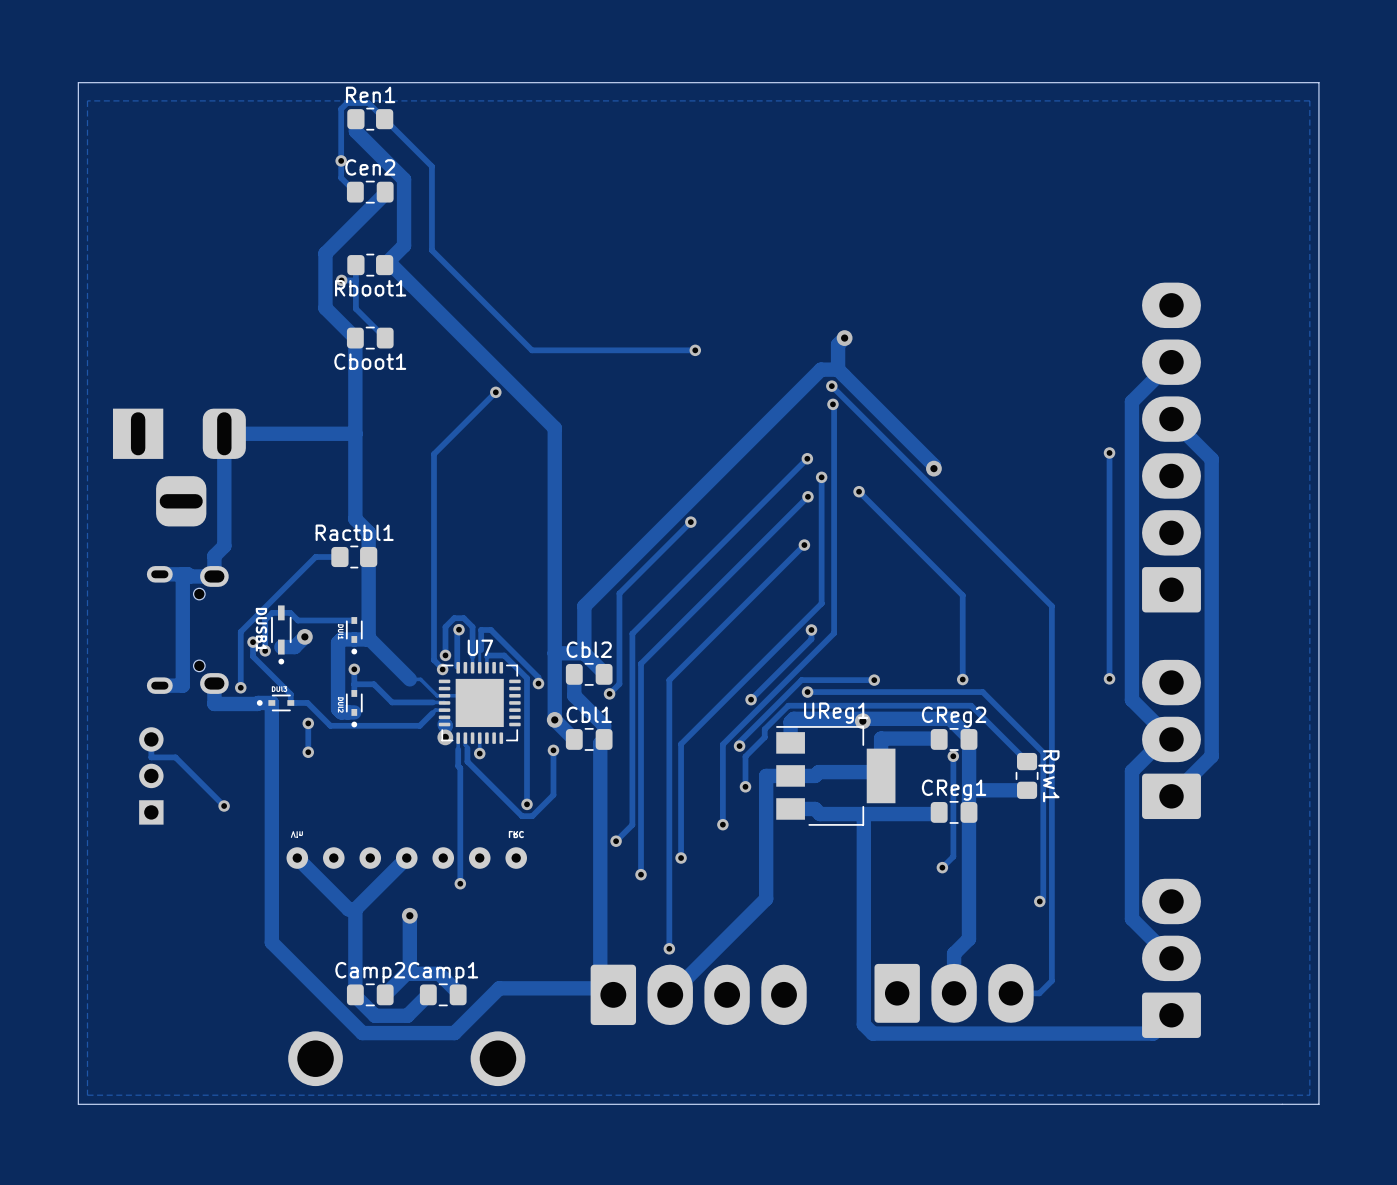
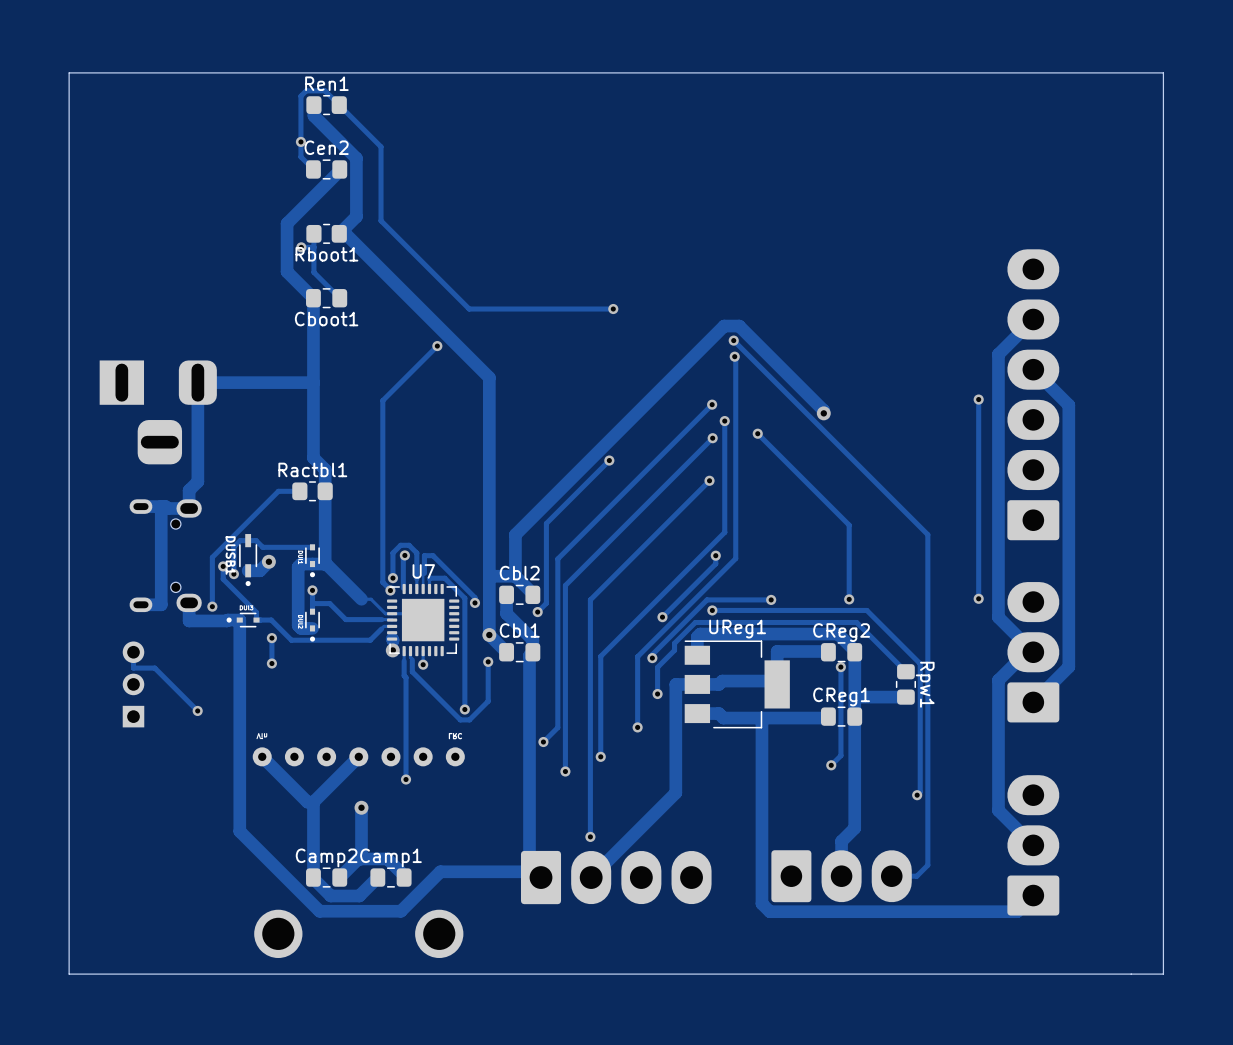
zone outline: (1309, 100) (1309, 1095) (87, 1095) (87, 100) (1309, 100) -> none
track: (844, 338) (838, 344) (838, 369) -> none
via: (844, 338) -> none
via: (862, 721) -> none

